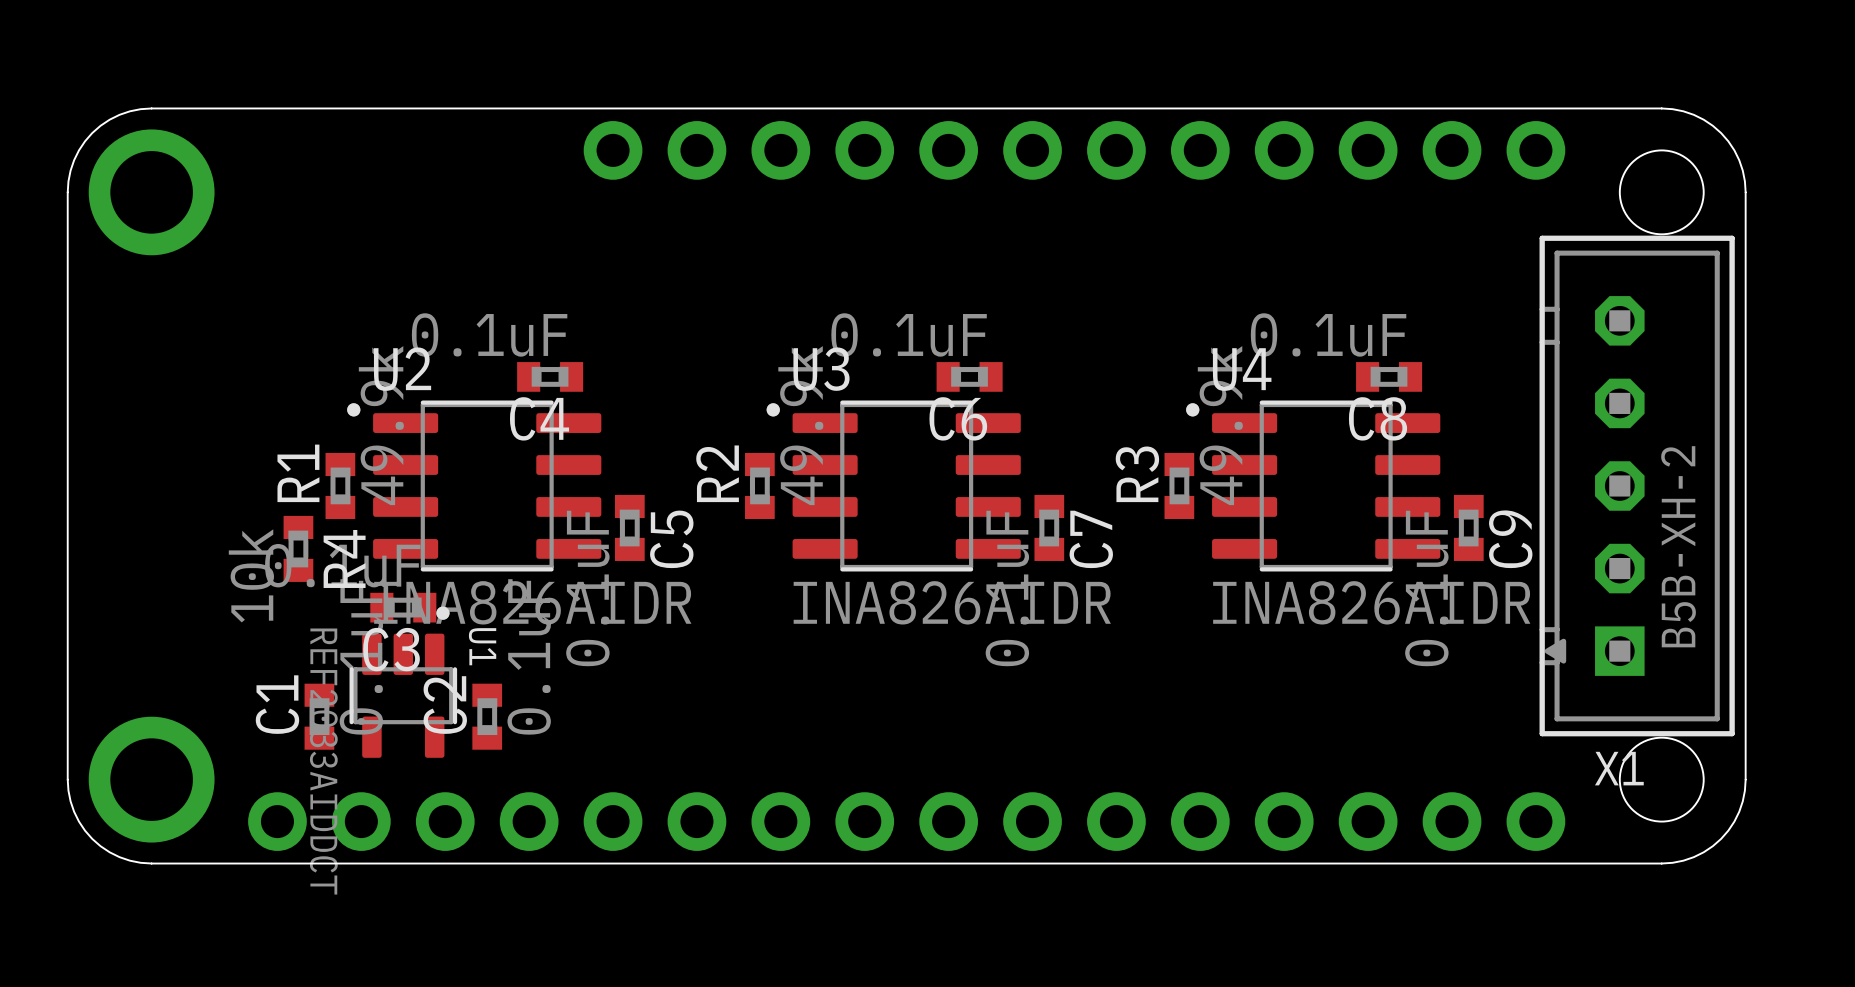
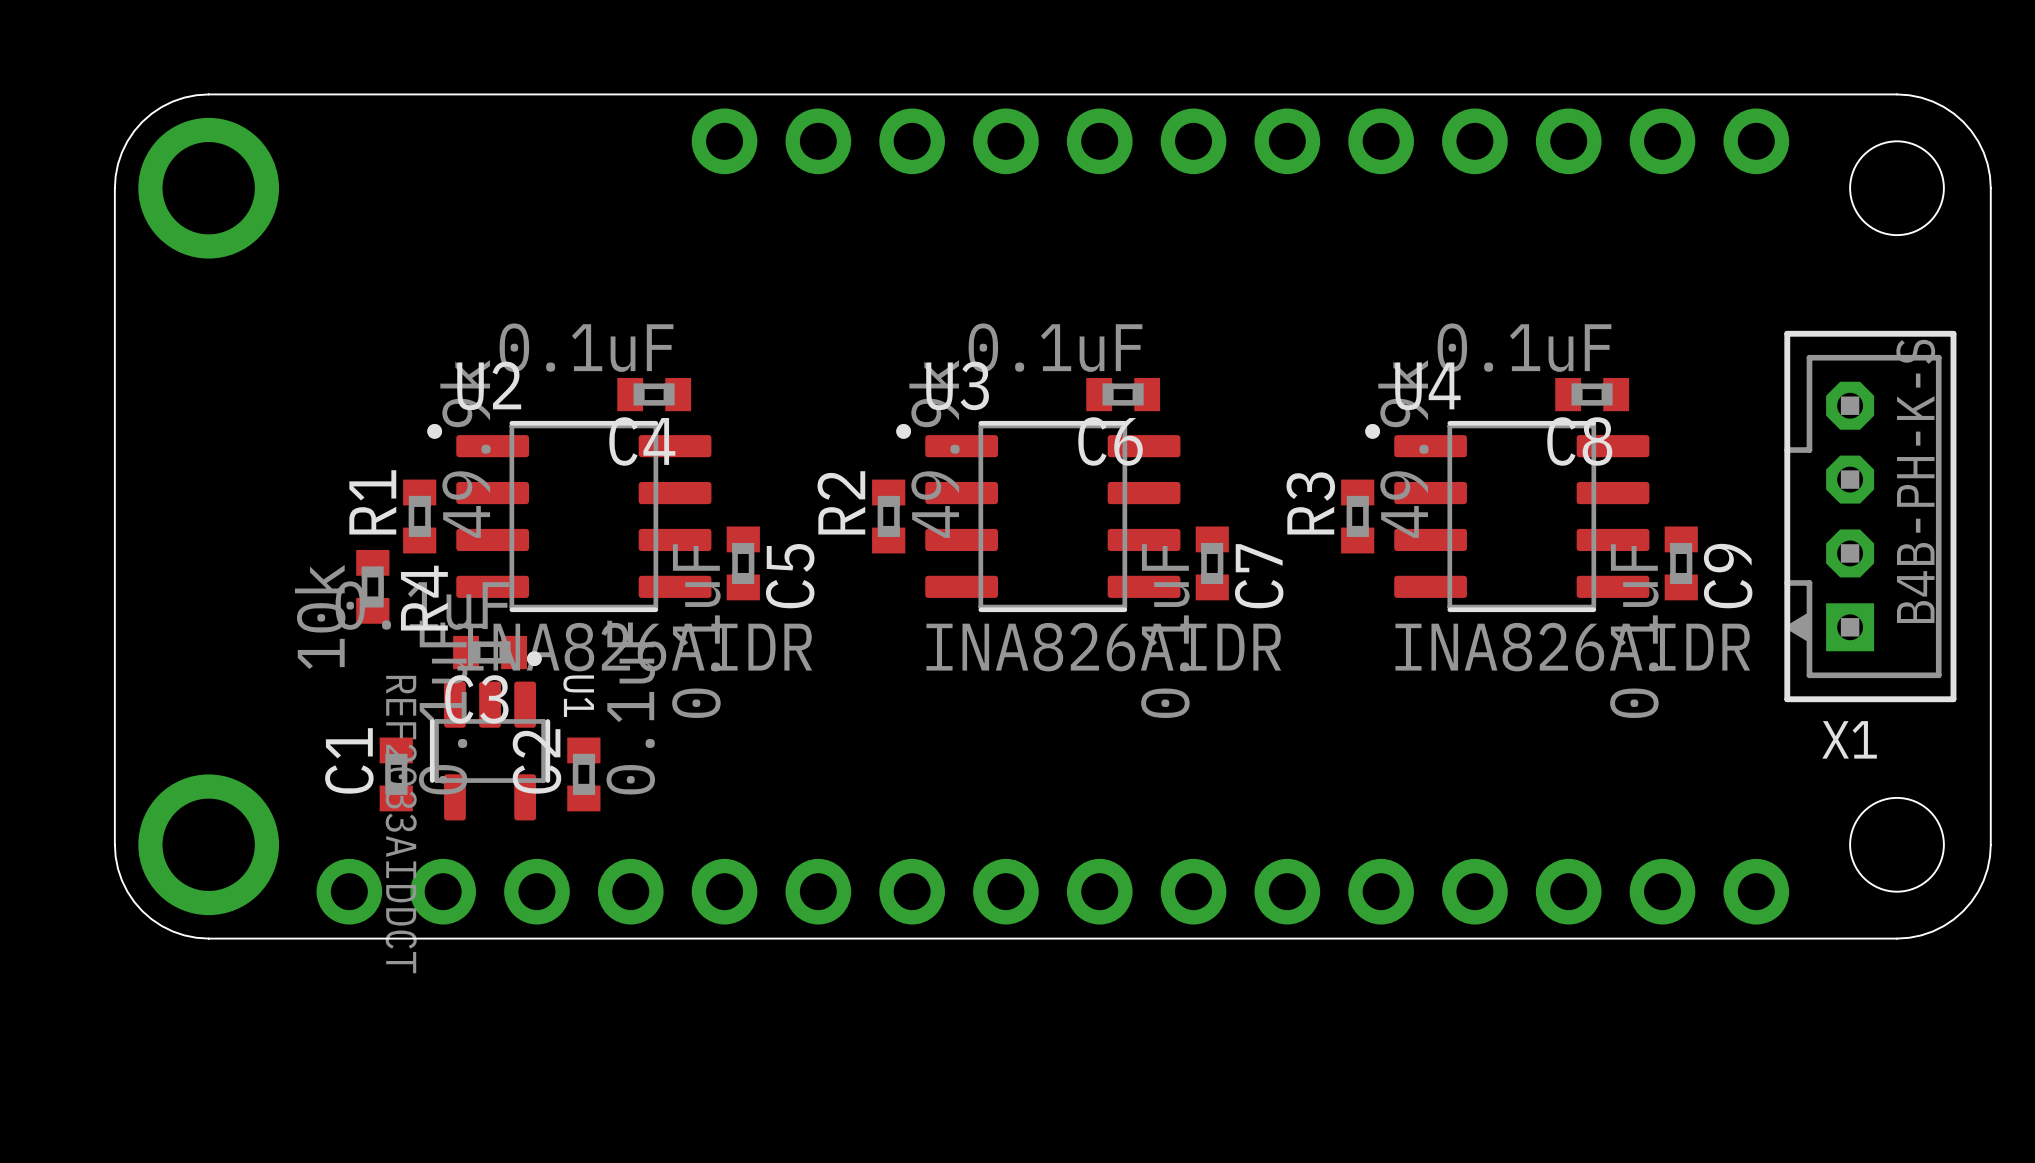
X1 footprint: [1539, 235, 1735, 737] -> [1784, 330, 1957, 703]
X1 value: B5B-XH-2 (1678, 546) -> B4B-PH-K-S (1915, 481)
X1 name position: X1 (1619, 768) -> X1 (1849, 739)

